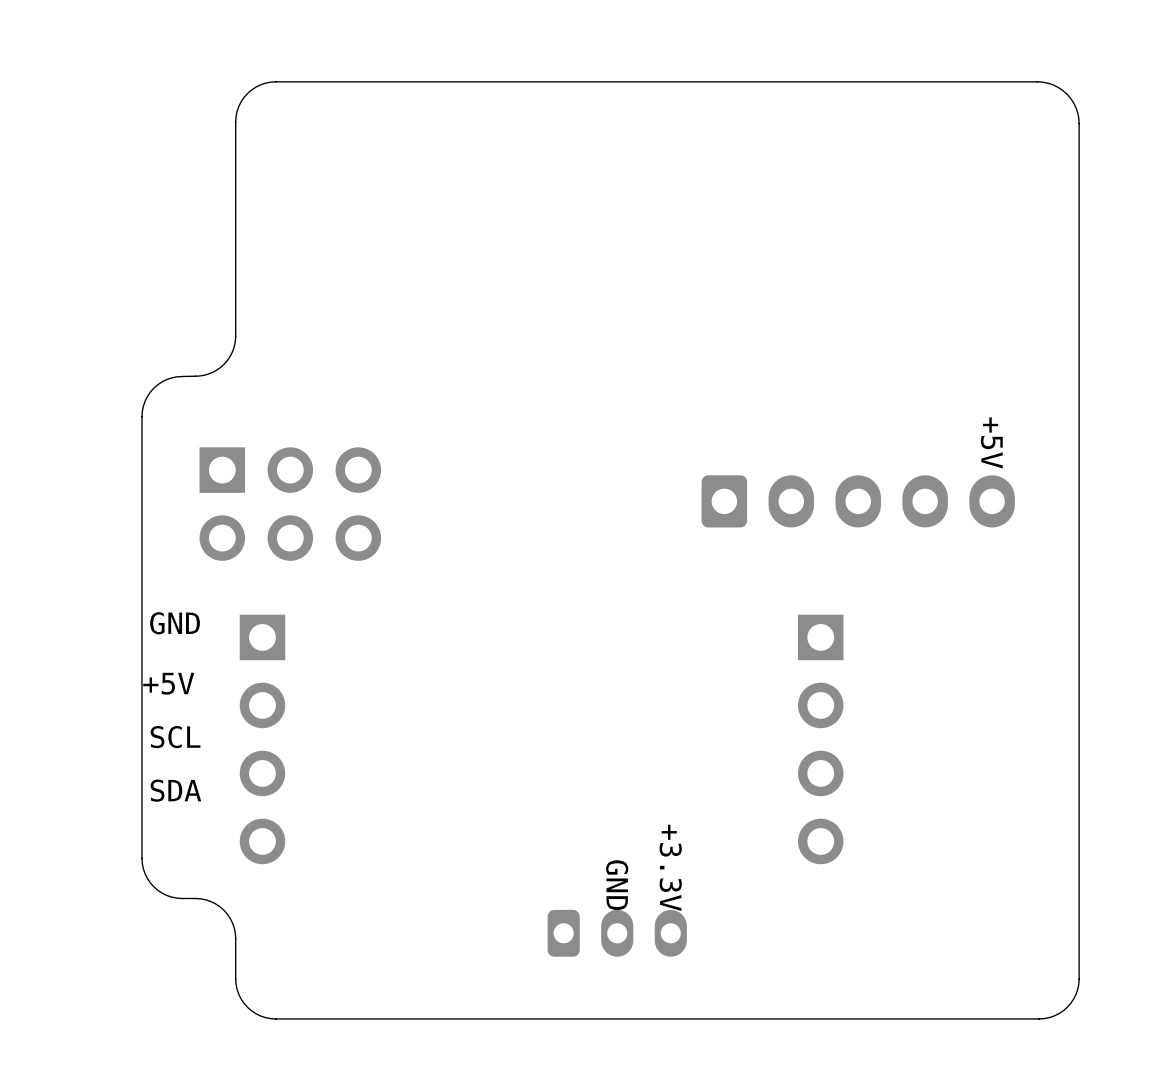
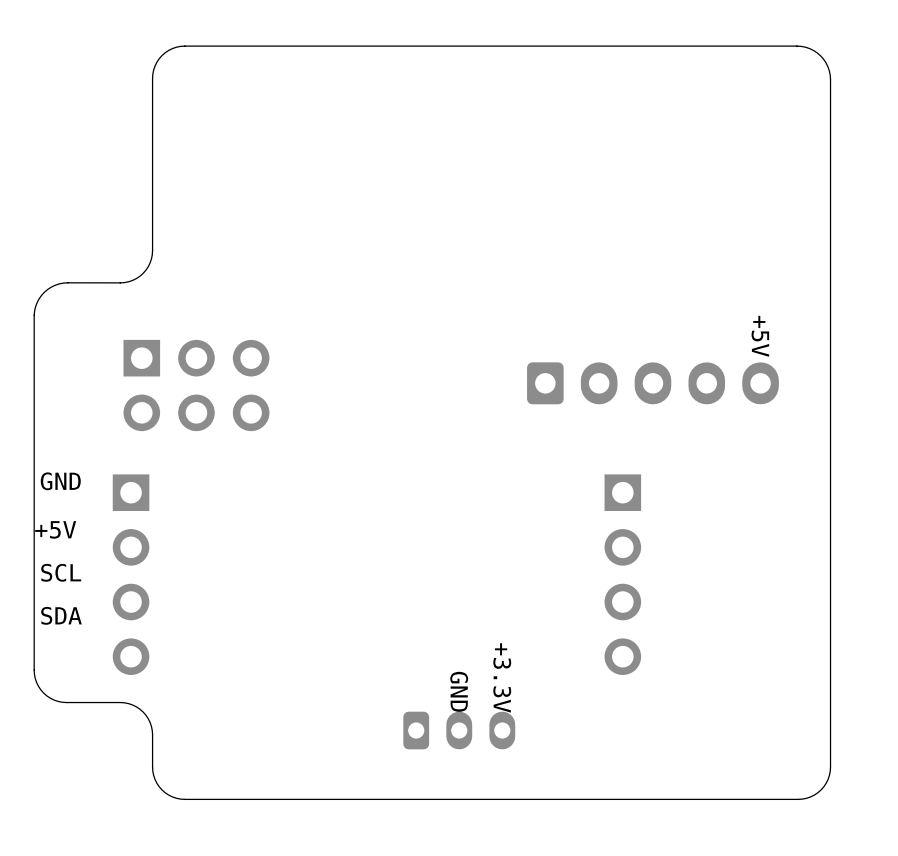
board edge: (235, 336) (231, 353) (220, 367) (204, 375) (176, 376) (162, 381) (147, 396) (142, 411) (142, 863) (147, 878) (157, 890) (171, 897) (182, 898) -> (152, 250) (150, 262) (145, 270) (132, 280) (120, 282) (59, 283) (44, 292) (35, 306) (34, 670)
text position: GND (175, 623) -> GND (60, 481)
text position: +5V (168, 683) -> +5V (55, 529)
text position: SCL (175, 737) -> SCL (61, 572)
part position: (262, 739) -> (131, 574)
text position: SDA (175, 790) -> SDA (61, 615)
board edge: none -> (34, 670) (38, 686) (43, 693) (54, 700) (66, 702) (109, 702)

